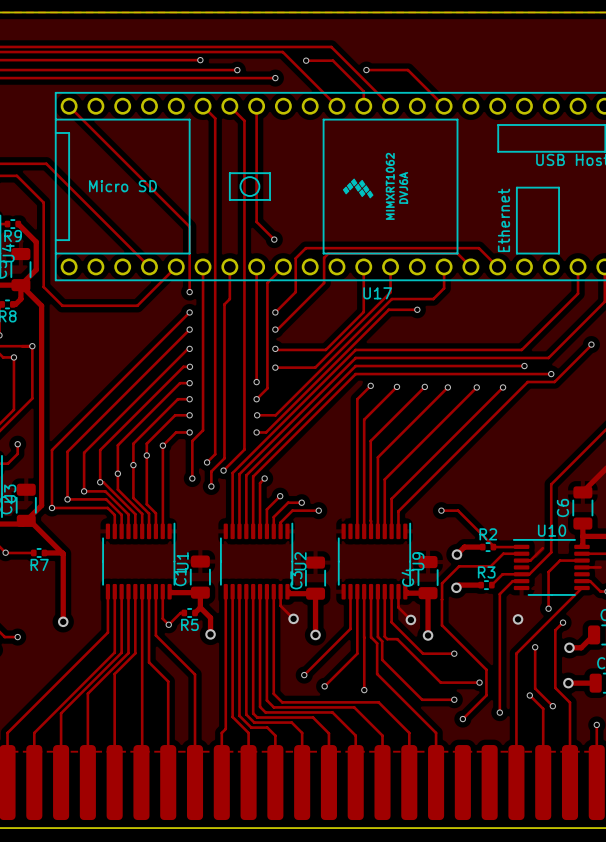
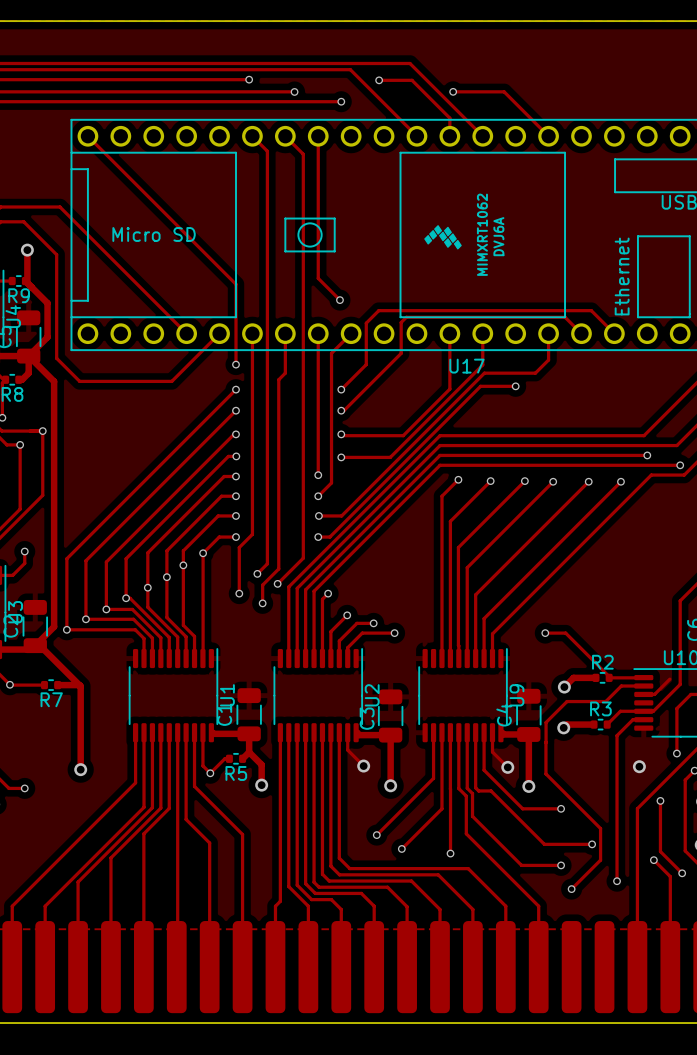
track: none -> (27, 250) (27, 283)
via: none -> (27, 250)

